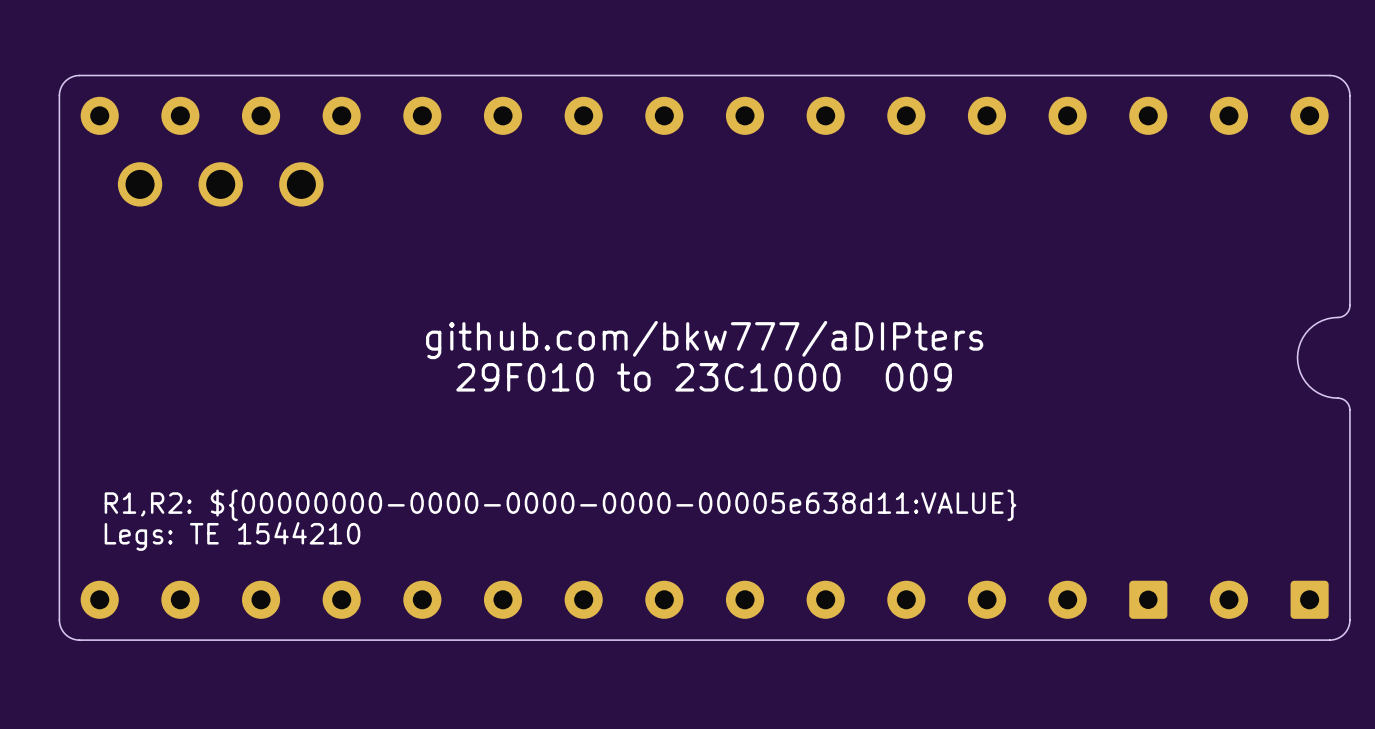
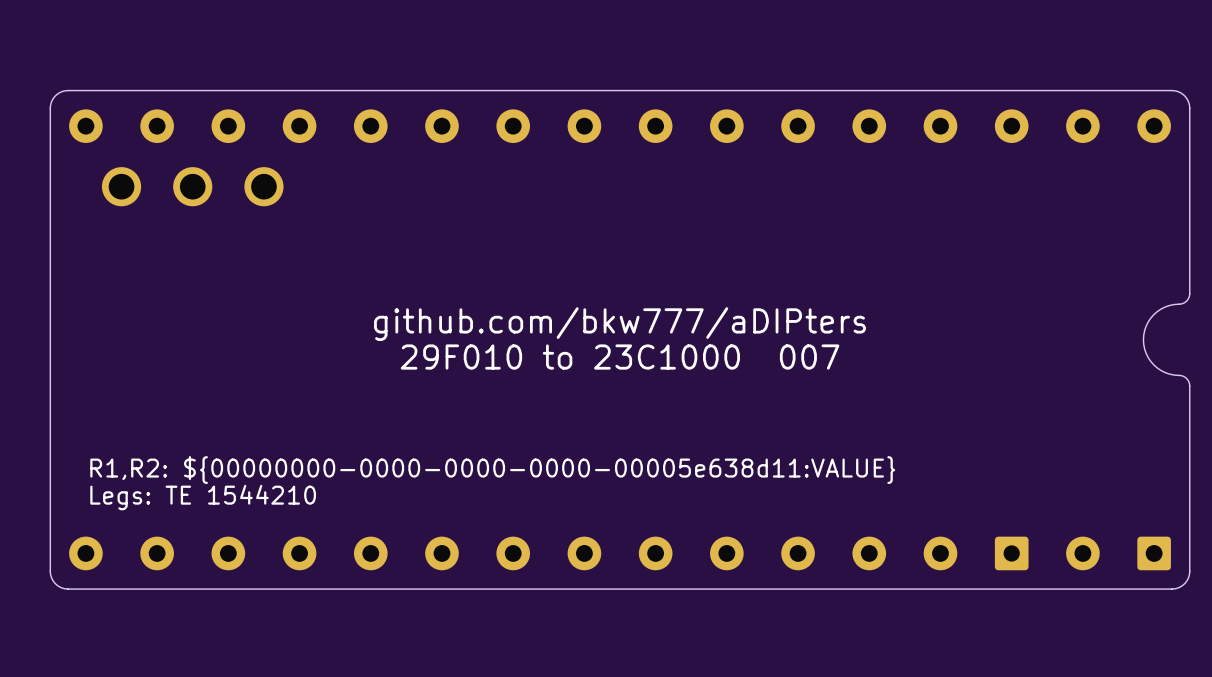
text: 29F010 to 23C1000 009 (704, 377) -> 29F010 to 23C1000 007 (620, 357)

